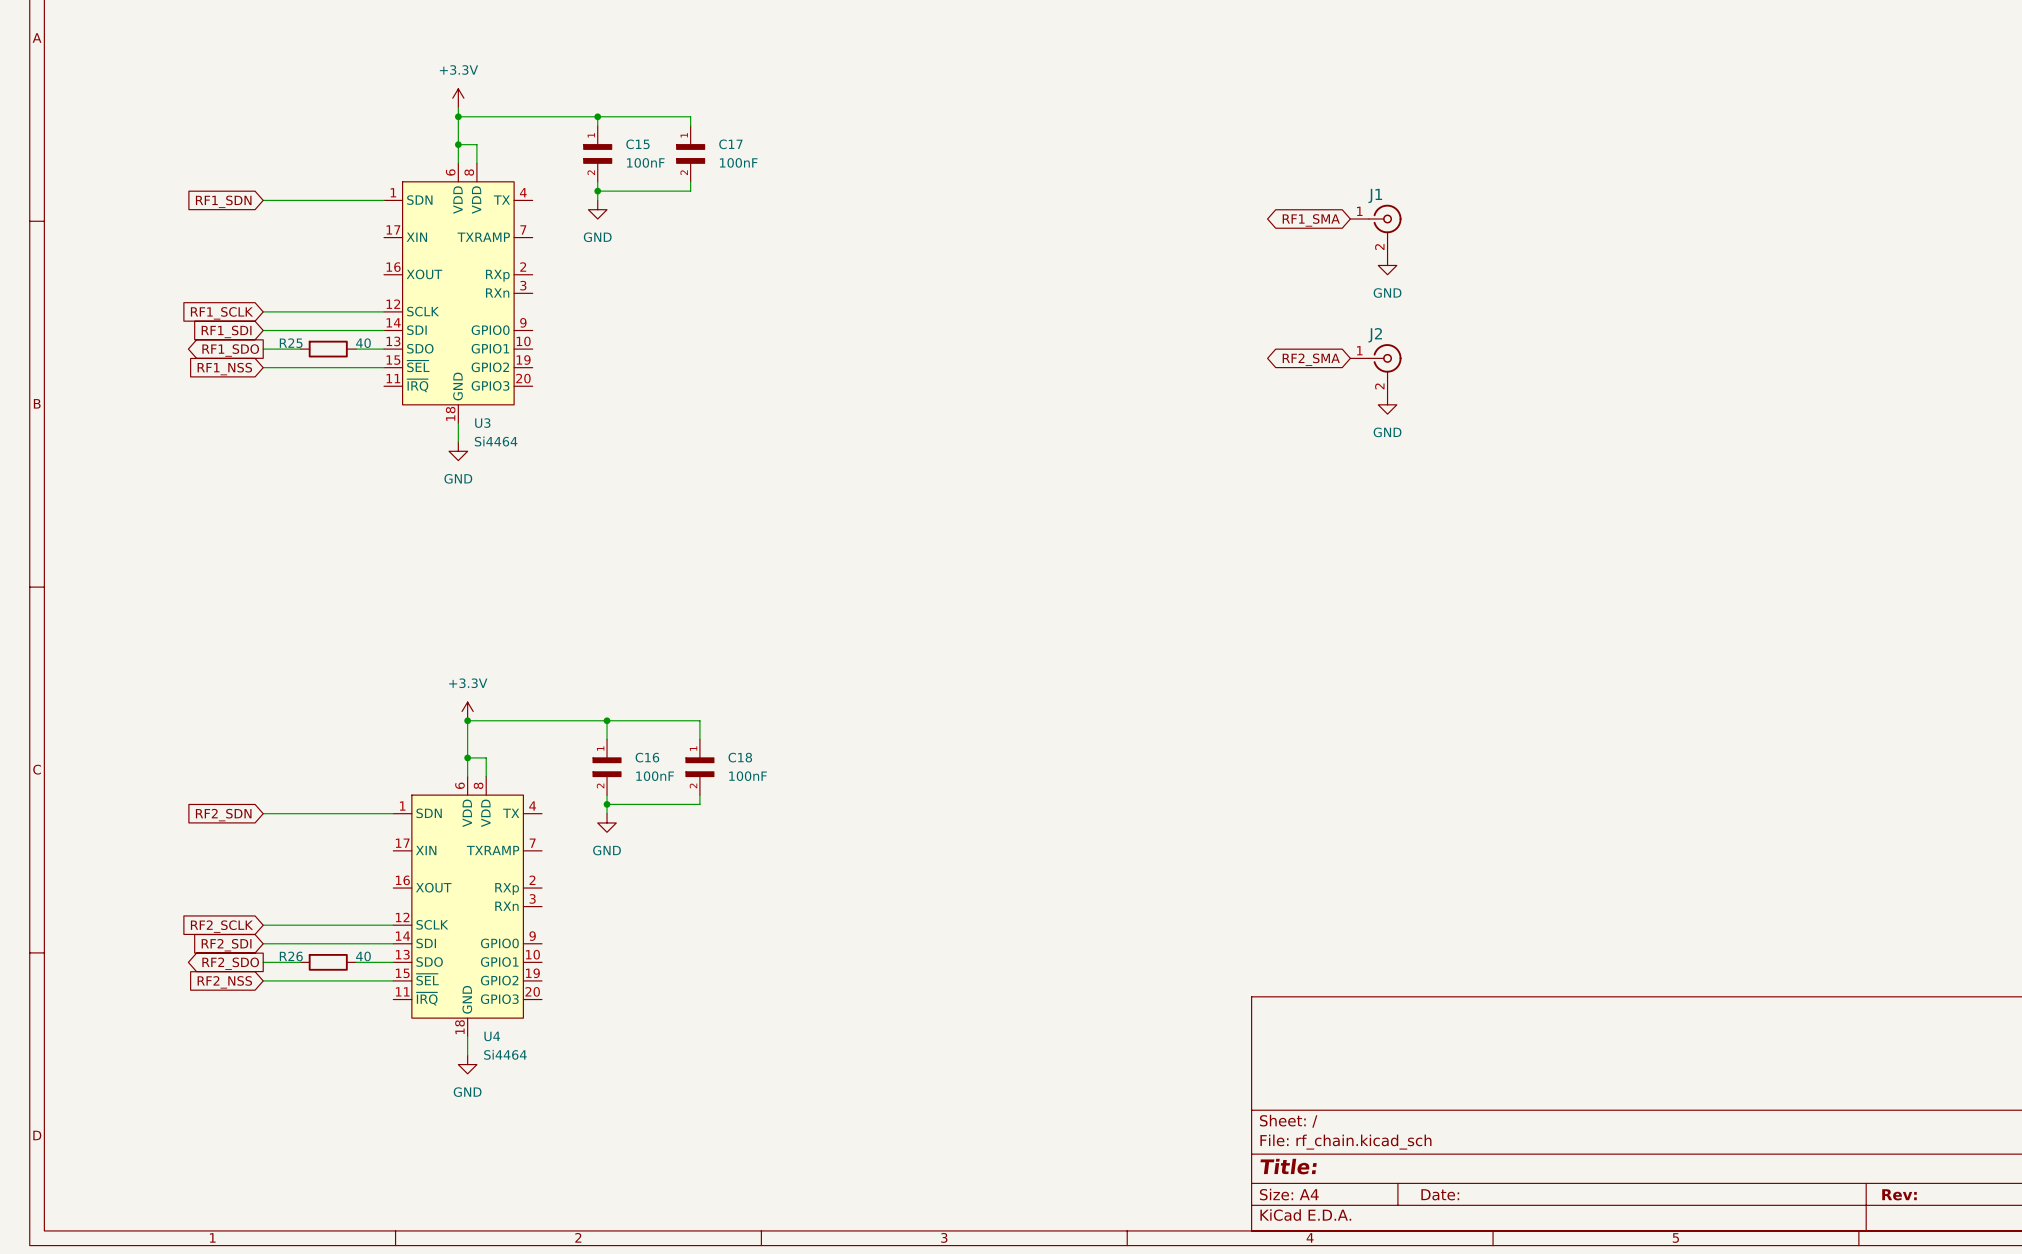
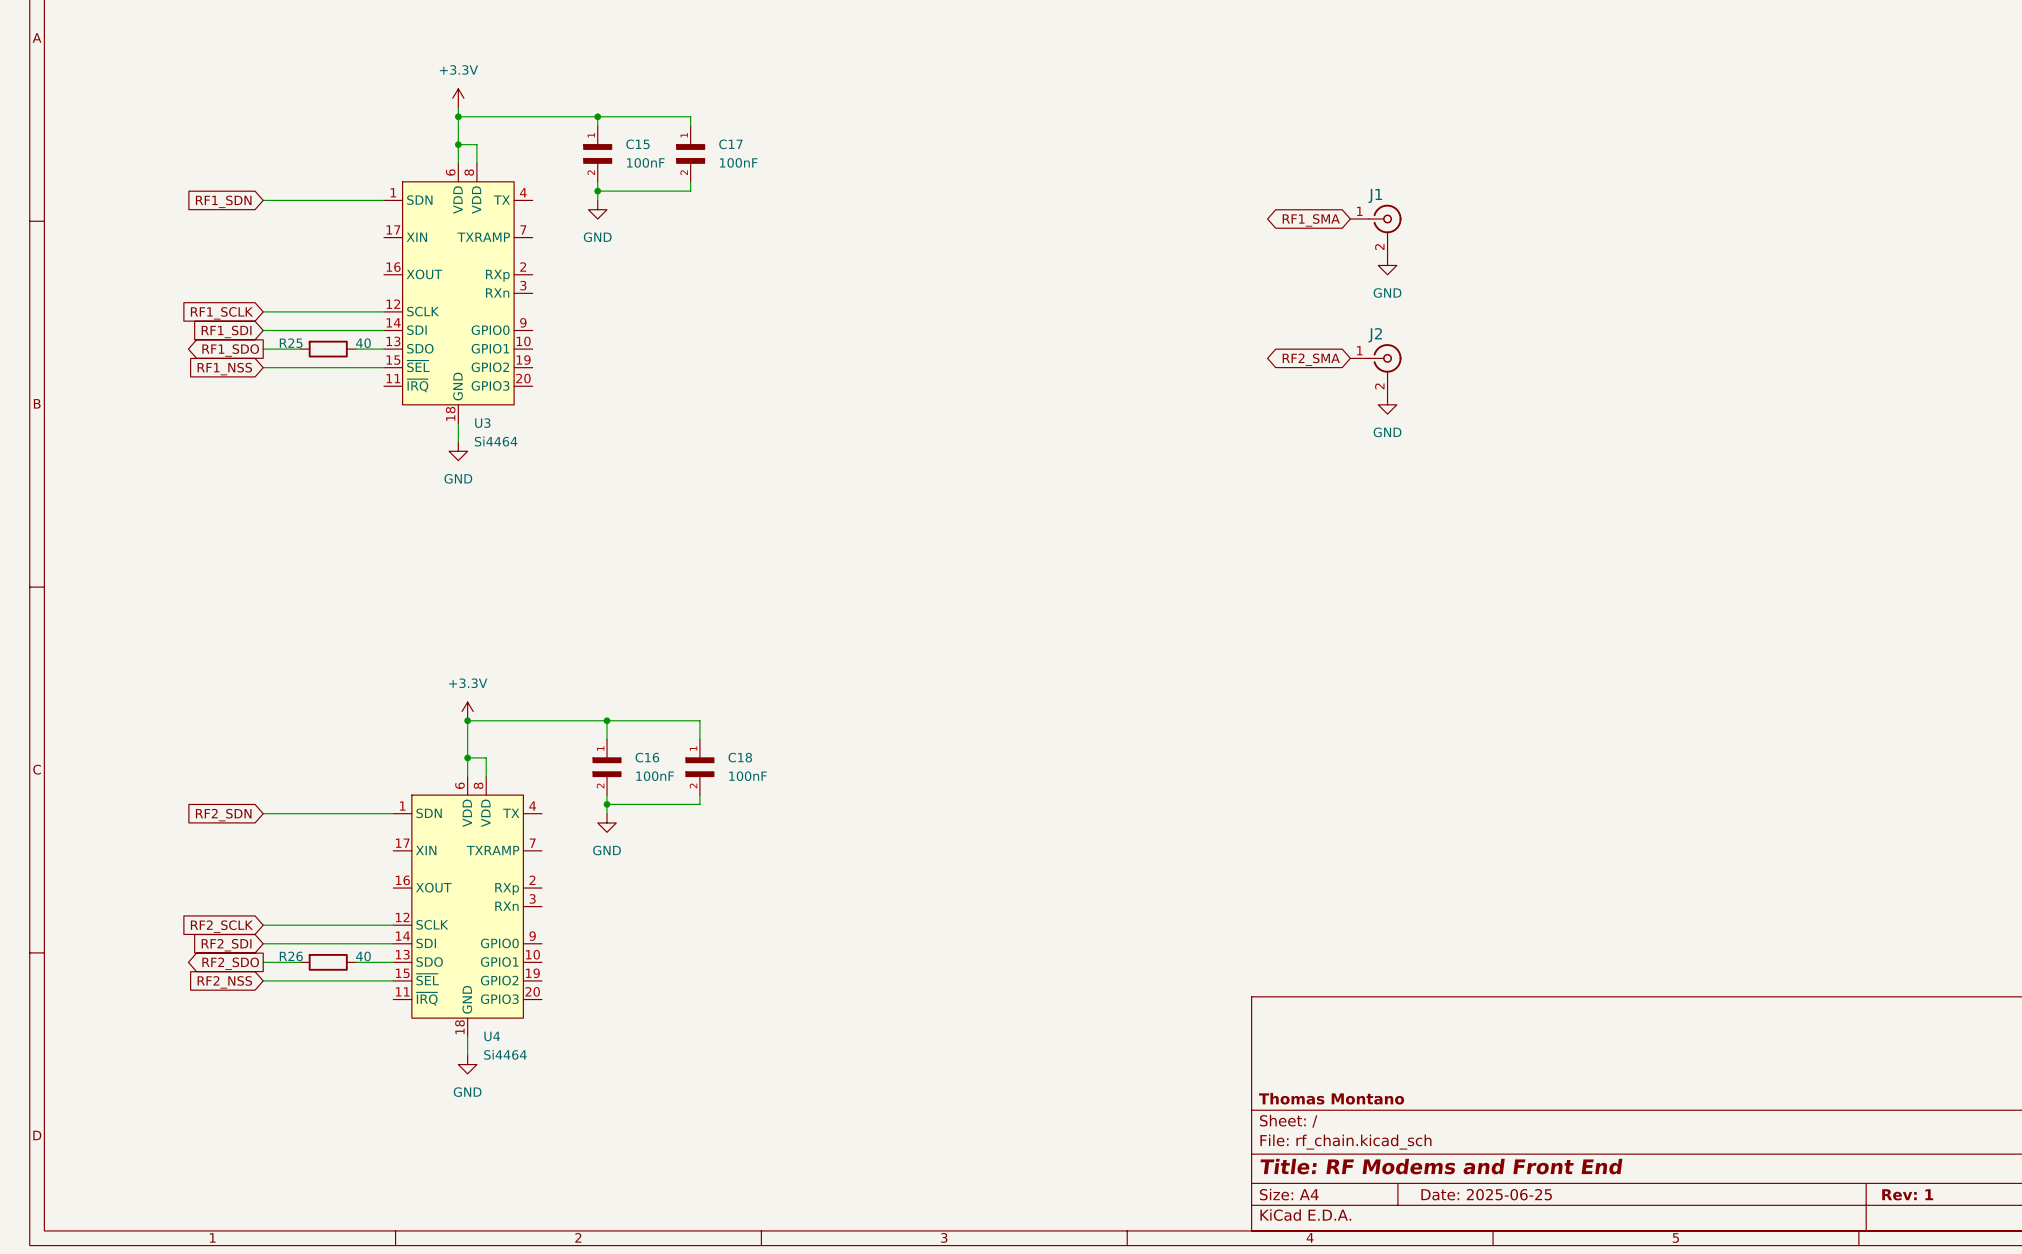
title block: none -> Thomas Montano (1331, 1098)
title block: Title: (1288, 1166) -> Title: RF Modems and Front End (1441, 1166)
title block: Date: (1440, 1194) -> Date: 2025-06-25 (1486, 1194)
title block: Rev: (1899, 1194) -> Rev: 1 (1907, 1194)

